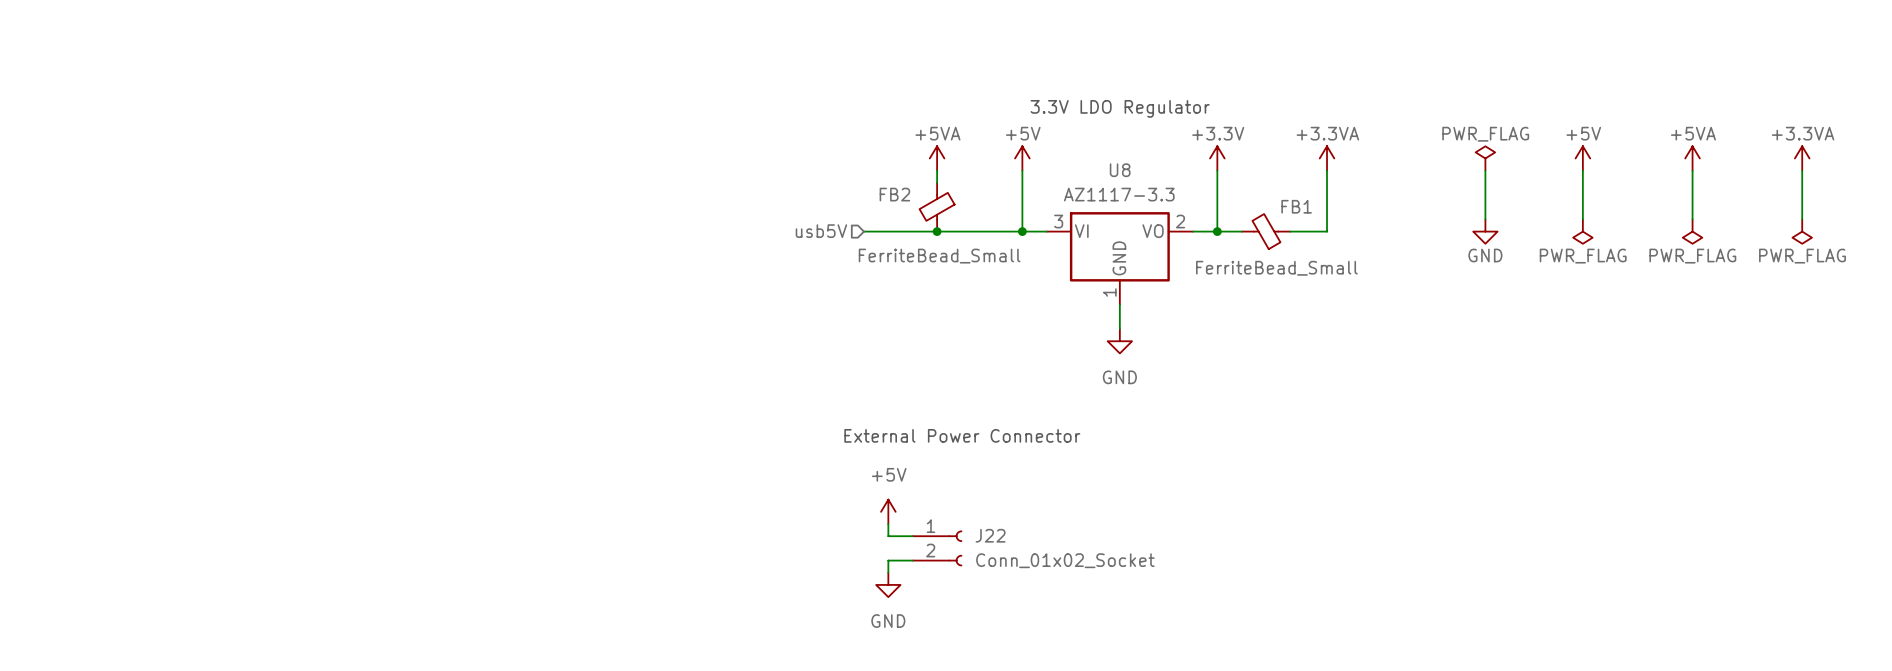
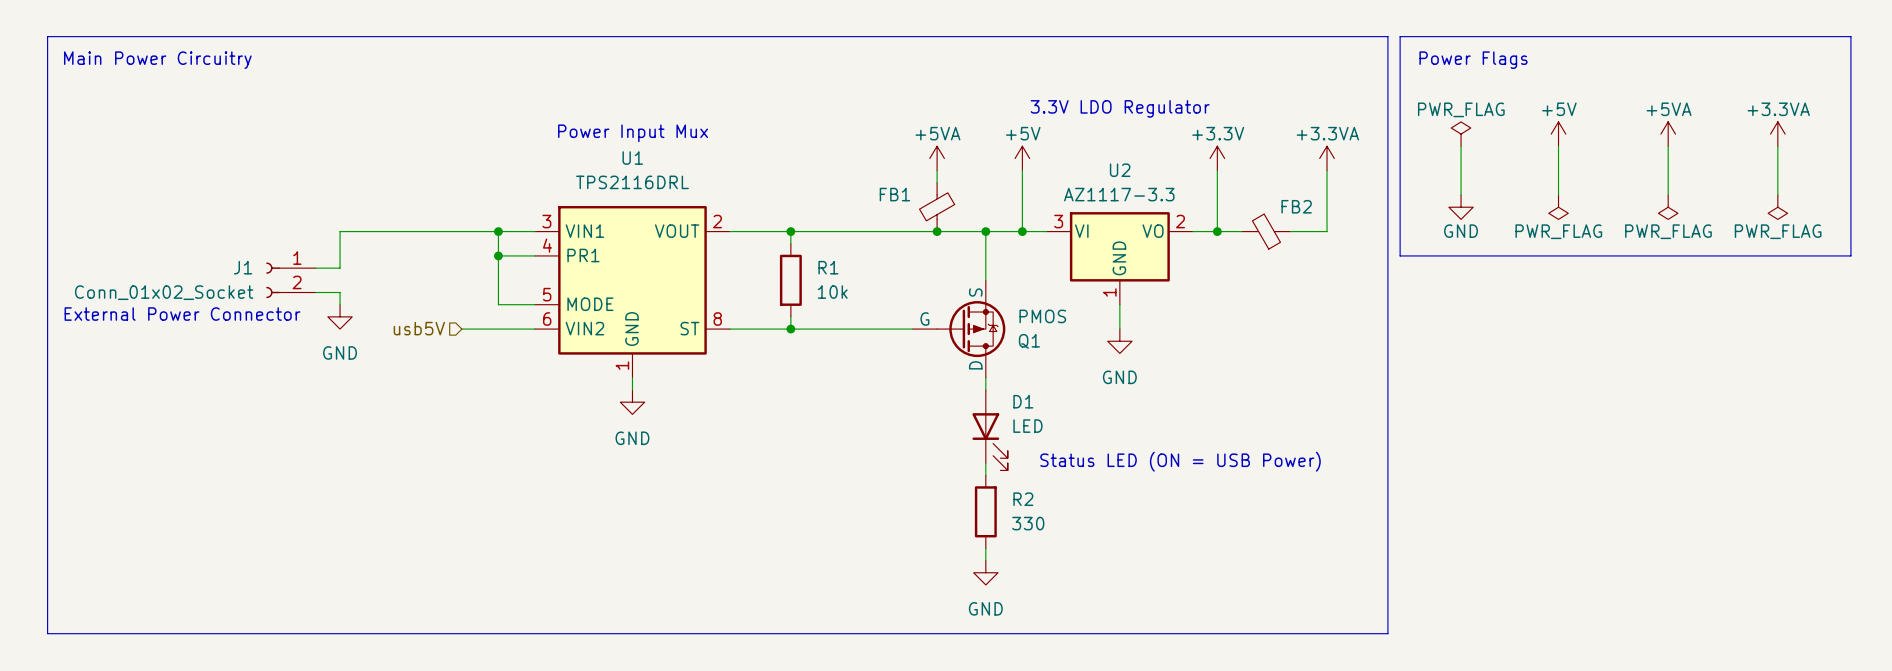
line: none -> (47, 36) (1387, 36) (1387, 633) (47, 633) (47, 36)
line: none -> (1400, 36) (1850, 36) (1850, 255) (1400, 255) (1400, 36)
text: none -> Main Power Circuitry (157, 60)
text: none -> Power Flags (1473, 60)
text: none -> Power Input Mux (633, 133)
power symbol position: PWR_FLAG (1485, 158) -> PWR_FLAG (1461, 134)
power symbol position: +5V (1582, 158) -> +5V (1558, 134)
power symbol position: +5VA (1692, 158) -> +5VA (1668, 134)
power symbol position: +3.3VA (1802, 158) -> +3.3VA (1777, 134)
U8 name: U8 (1120, 170) -> U2 (1120, 170)
wire: (1485, 170) (1485, 219) -> (1461, 146) (1461, 195)
wire: (1582, 170) (1582, 219) -> (1558, 146) (1558, 195)
wire: (1692, 170) (1692, 219) -> (1668, 146) (1668, 195)
wire: (1802, 170) (1802, 219) -> (1777, 146) (1777, 195)
FB2 name: FB2 (894, 194) -> FB1 (894, 194)
FB1 name: FB1 (1296, 206) -> FB2 (1296, 206)
wire: none -> (498, 231) (498, 304) (534, 304)
junction: none -> (498, 231)
wire: none -> (534, 231) (340, 231) (340, 268) (315, 268)
wire: none -> (729, 231) (863, 231)
wire: none -> (790, 231) (790, 243)
junction: none -> (790, 231)
hierarchical label: usb5V (821, 231) -> none
wire: none -> (985, 231) (985, 280)
junction: none -> (985, 231)
power symbol position: GND (1485, 231) -> GND (1461, 207)
power symbol position: PWR_FLAG (1582, 231) -> PWR_FLAG (1558, 207)
power symbol position: PWR_FLAG (1692, 231) -> PWR_FLAG (1668, 207)
power symbol position: PWR_FLAG (1802, 231) -> PWR_FLAG (1777, 207)
wire: none -> (498, 255) (534, 255)
junction: none -> (498, 255)
FB2 value: FerriteBead_Small (939, 256) -> none
FB1 value: FerriteBead_Small (1276, 268) -> none
J1: none -> Conn_01x02_Socket (290, 280)
R1: none -> 10k (790, 280)
U1: none -> TPS2116DRL (632, 291)
wire: none -> (315, 292) (340, 292) (340, 304)
text: none -> External Power Connector (182, 314)
power symbol: none -> GND (340, 316)
wire: none -> (790, 316) (790, 329)
hierarchical label: none -> usb5V (419, 328)
wire: none -> (461, 329) (534, 329)
wire: none -> (729, 329) (912, 329)
junction: none -> (790, 329)
Q1: none -> PMOS (959, 329)
wire: none -> (632, 377) (632, 389)
wire: none -> (985, 377) (985, 389)
power symbol: none -> GND (632, 402)
D1: none -> LED (990, 430)
text: External Power Connector (962, 435) -> none
text: none -> Status LED (ON = USB Power) (1180, 461)
wire: none -> (985, 463) (985, 475)
power symbol: +5V (888, 511) -> none
R2: none -> 330 (985, 511)
wire: (888, 524) (888, 536) (912, 536) -> none
J22: Conn_01x02_Socket (937, 548) -> none
wire: none -> (985, 548) (985, 560)
wire: (912, 560) (888, 560) (888, 572) -> none
power symbol position: GND (888, 584) -> GND (985, 572)

